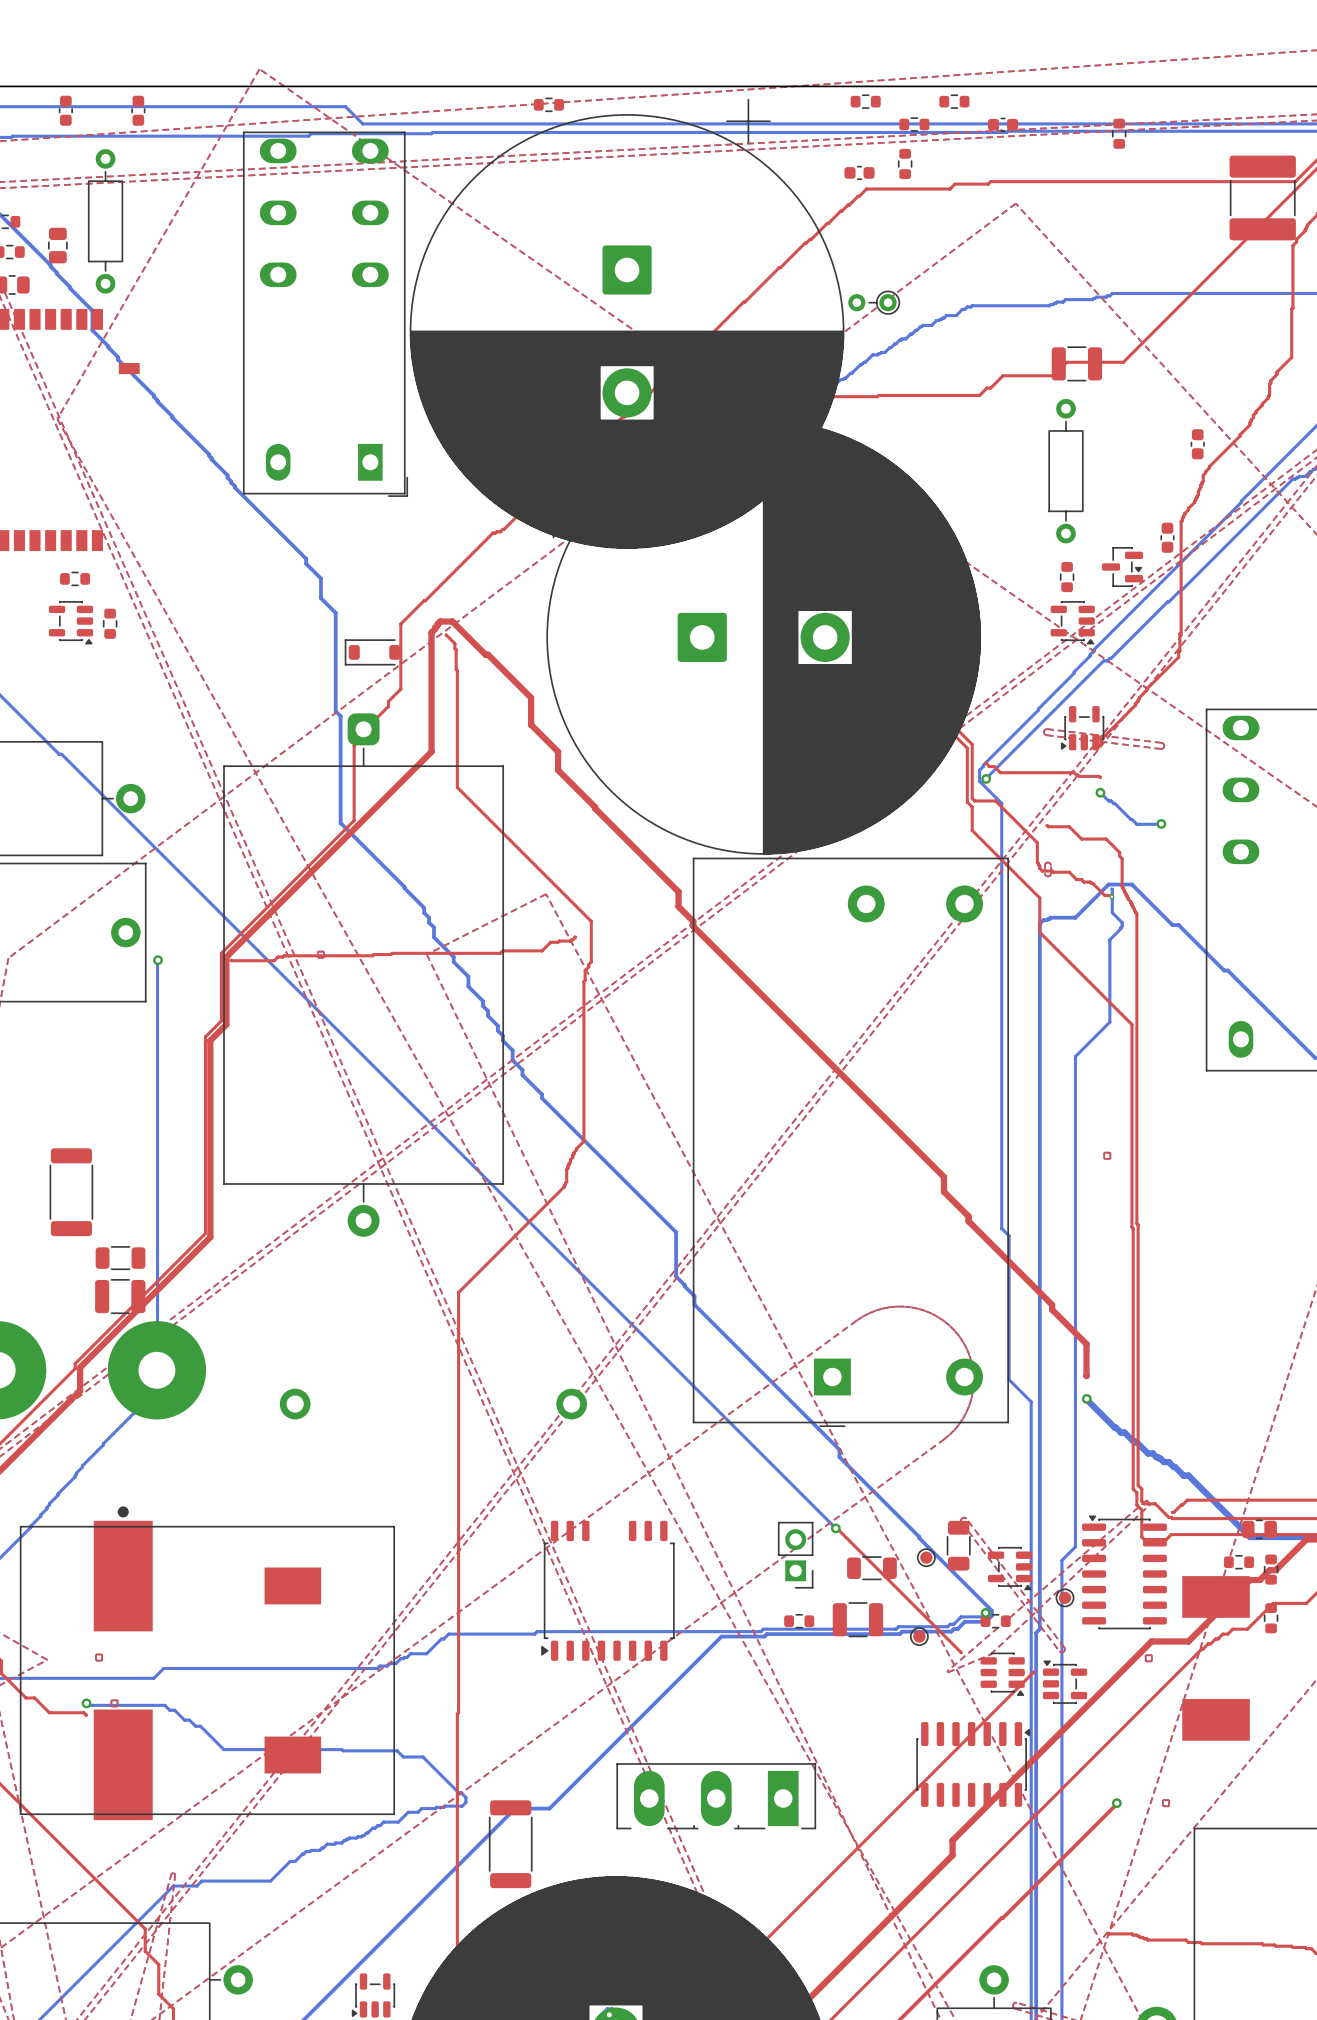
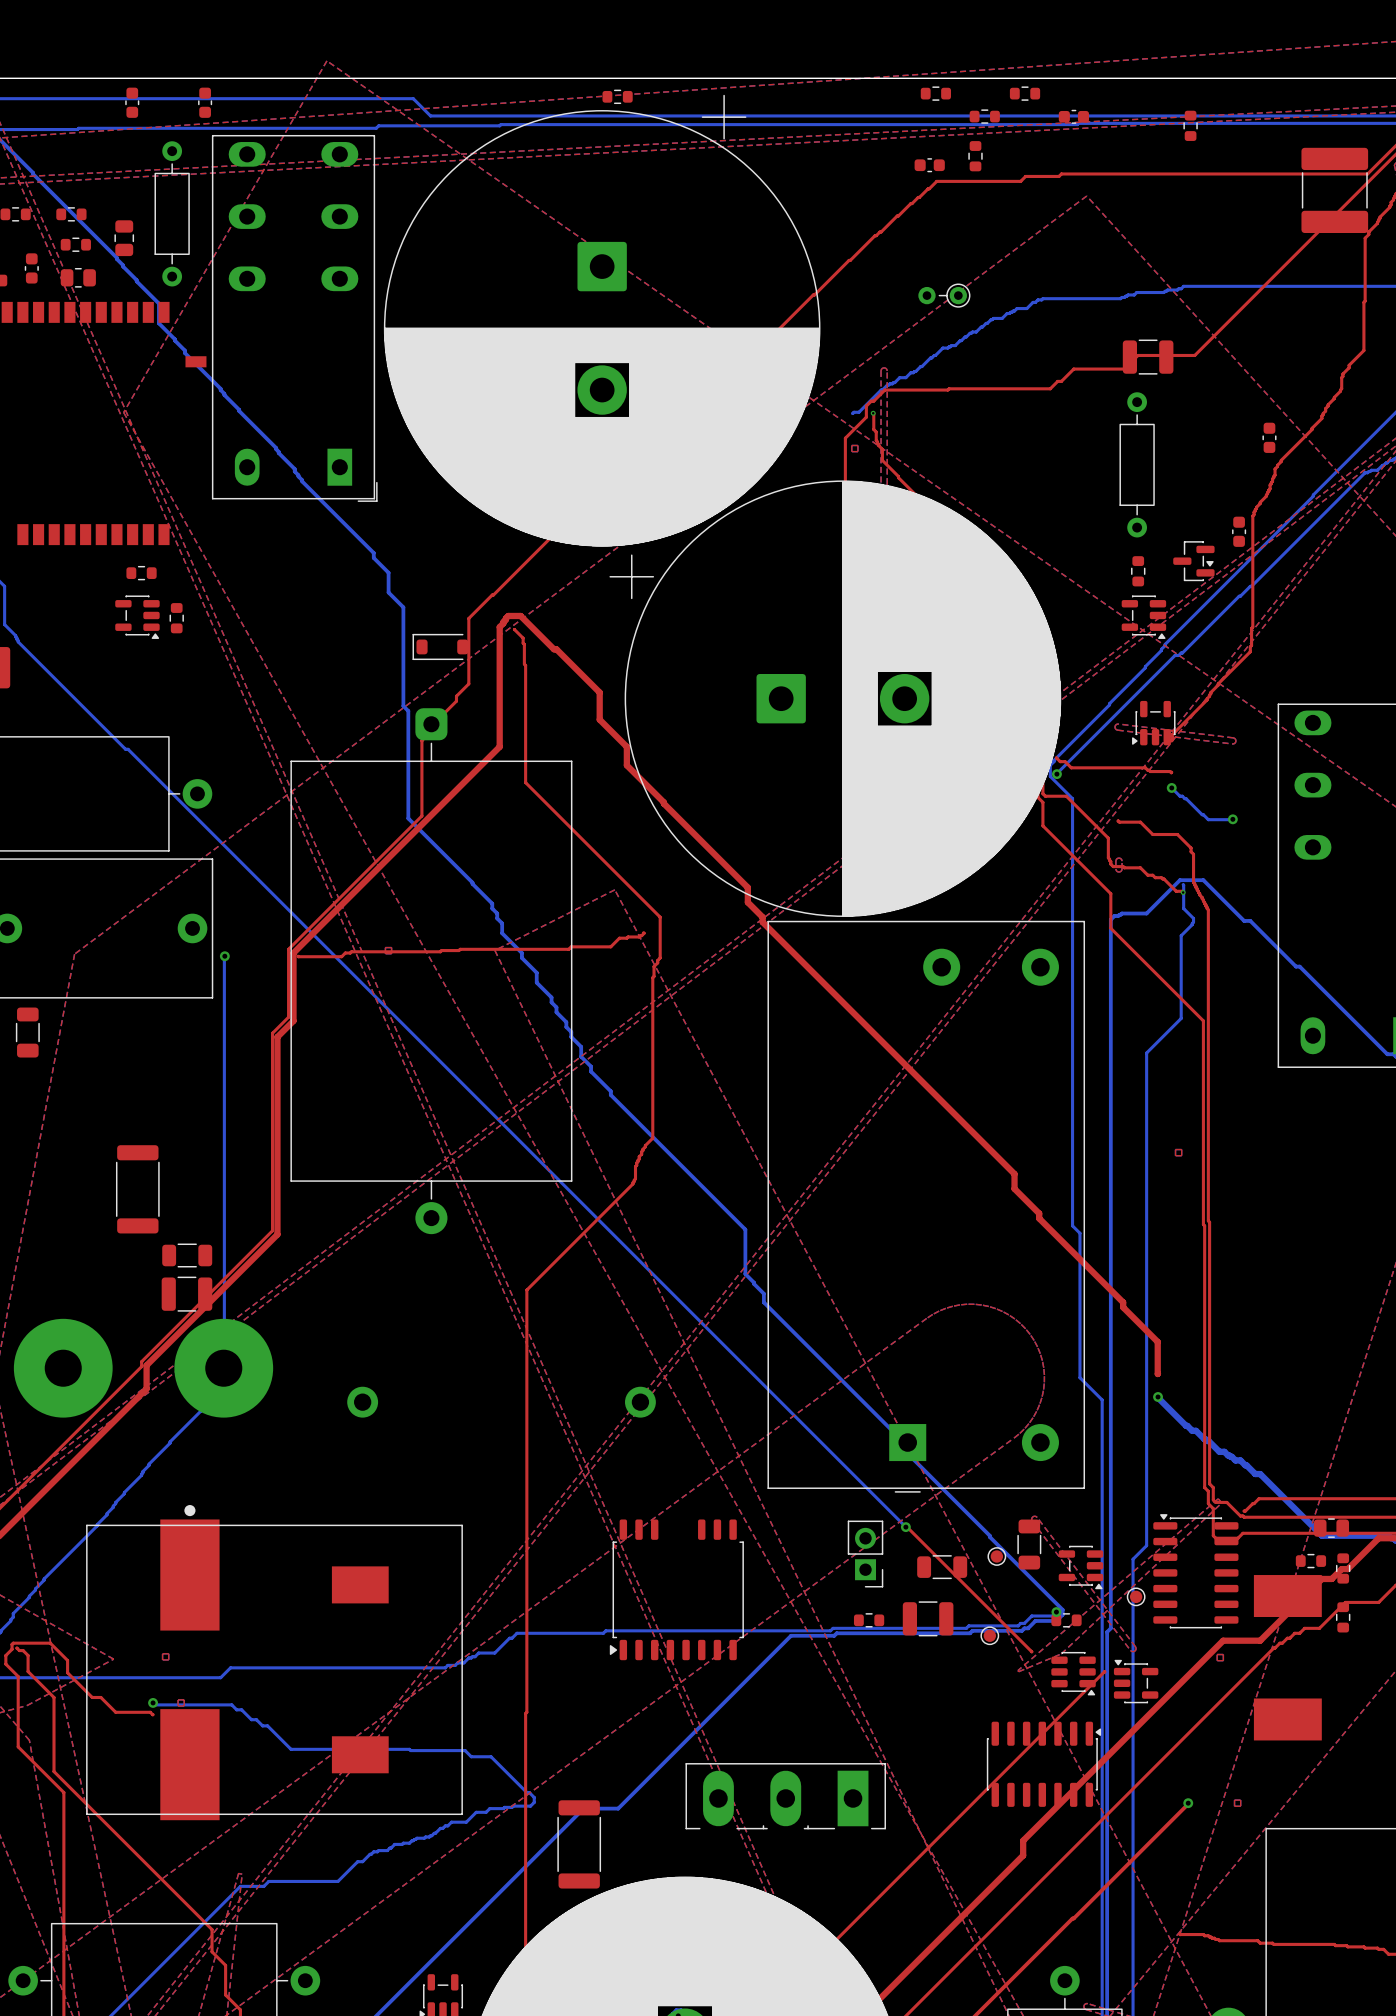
part position: (325, 314) -> (294, 318)
part position: (627, 323) -> (602, 320)
part position: (756, 637) -> (835, 698)
part position: (850, 1142) -> (926, 1206)

